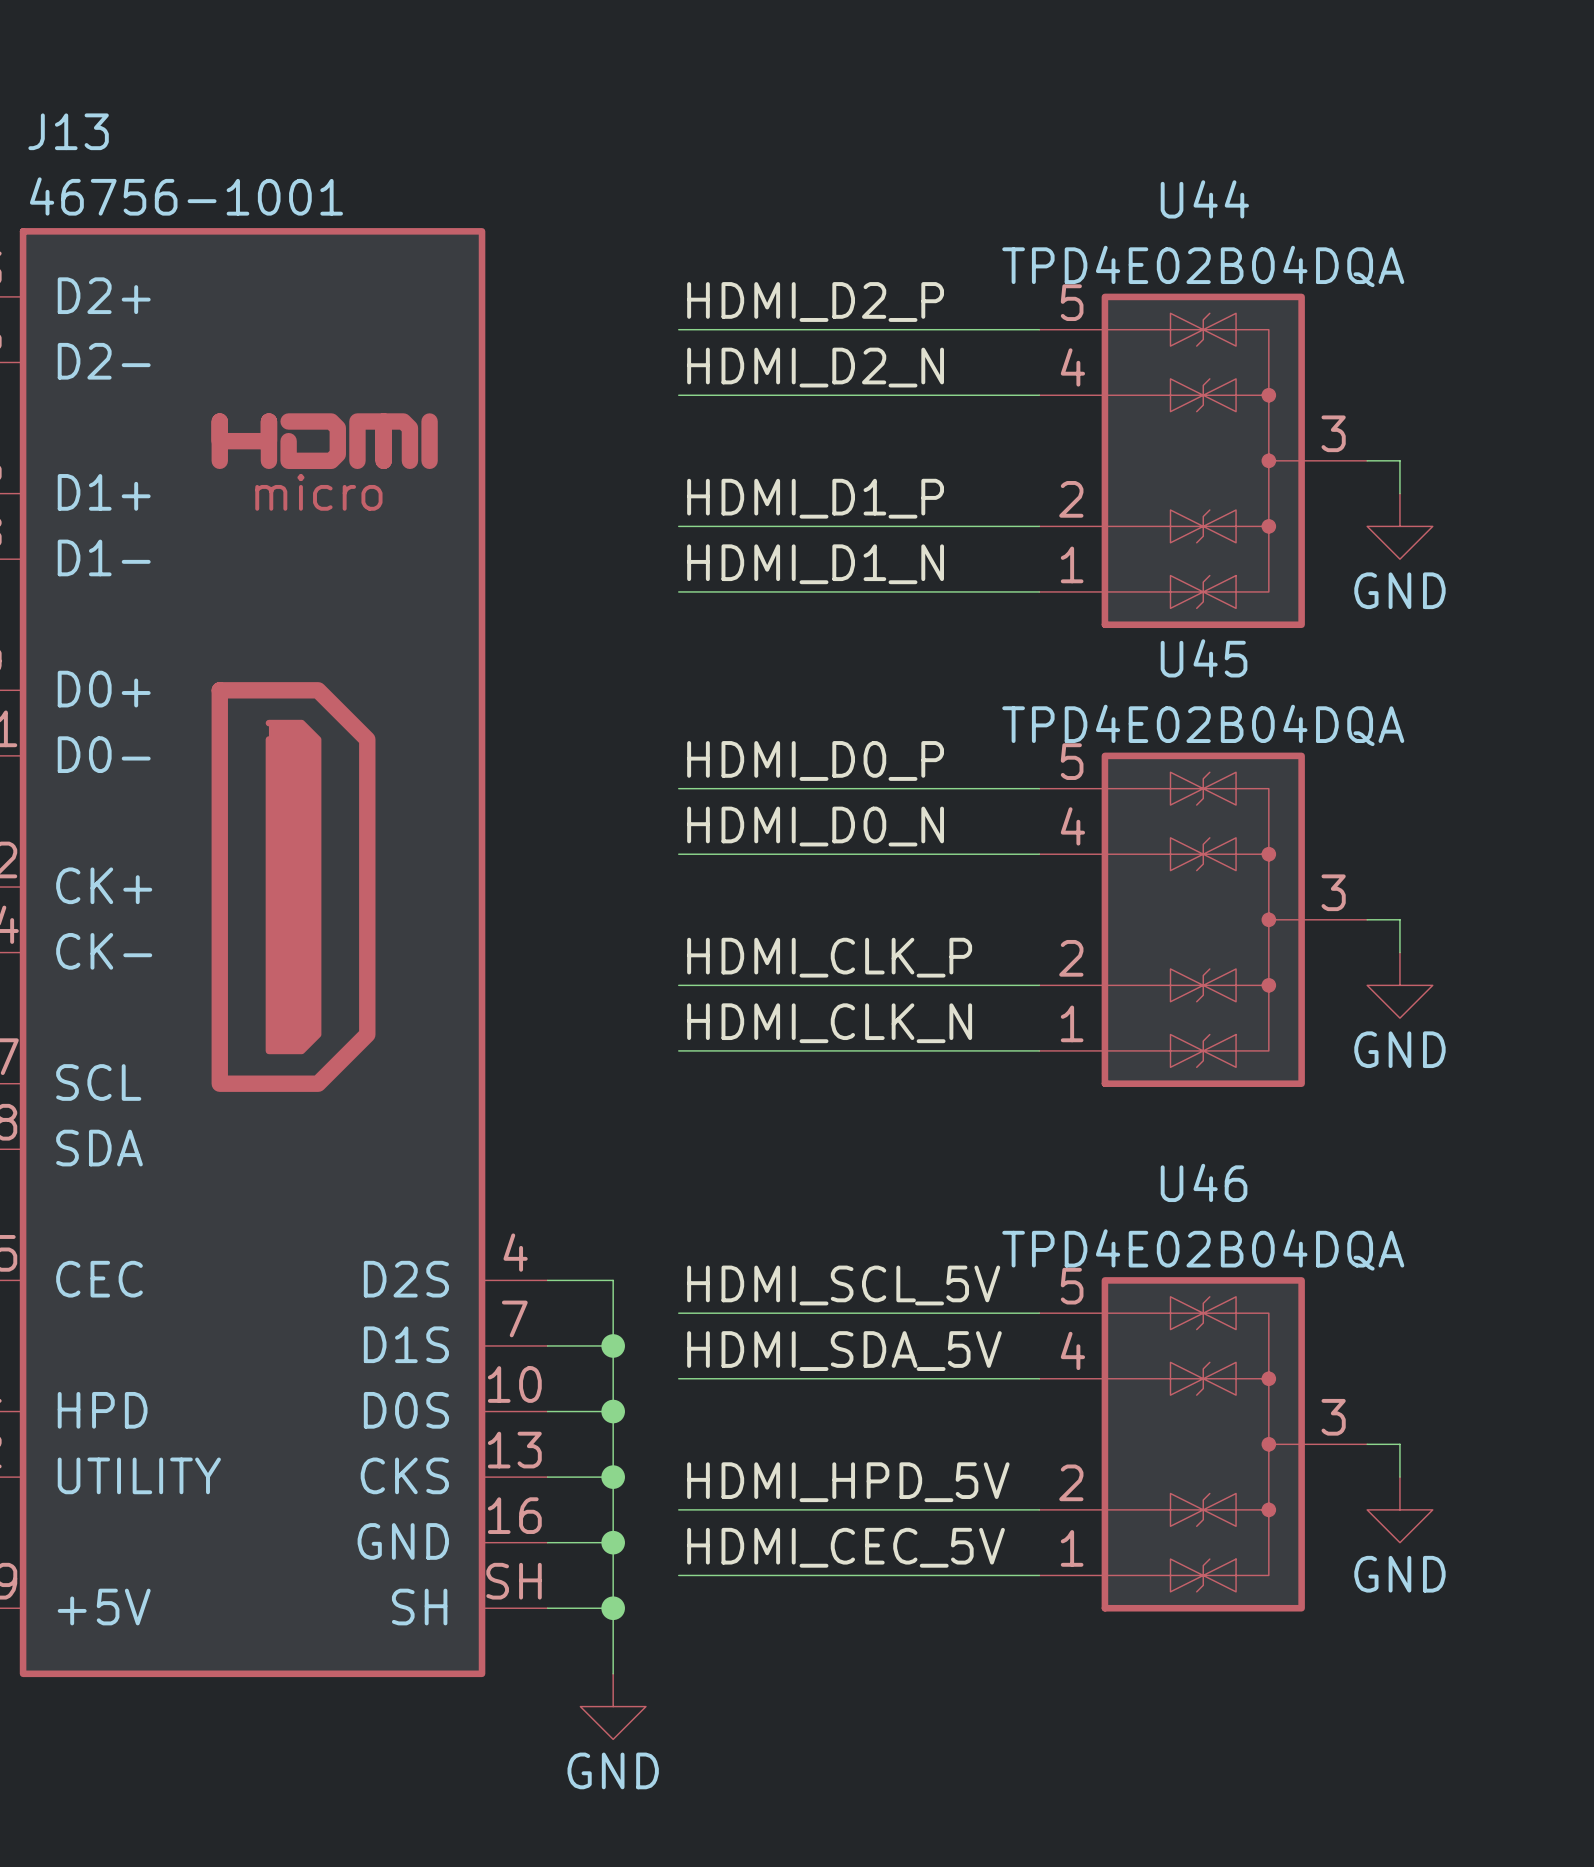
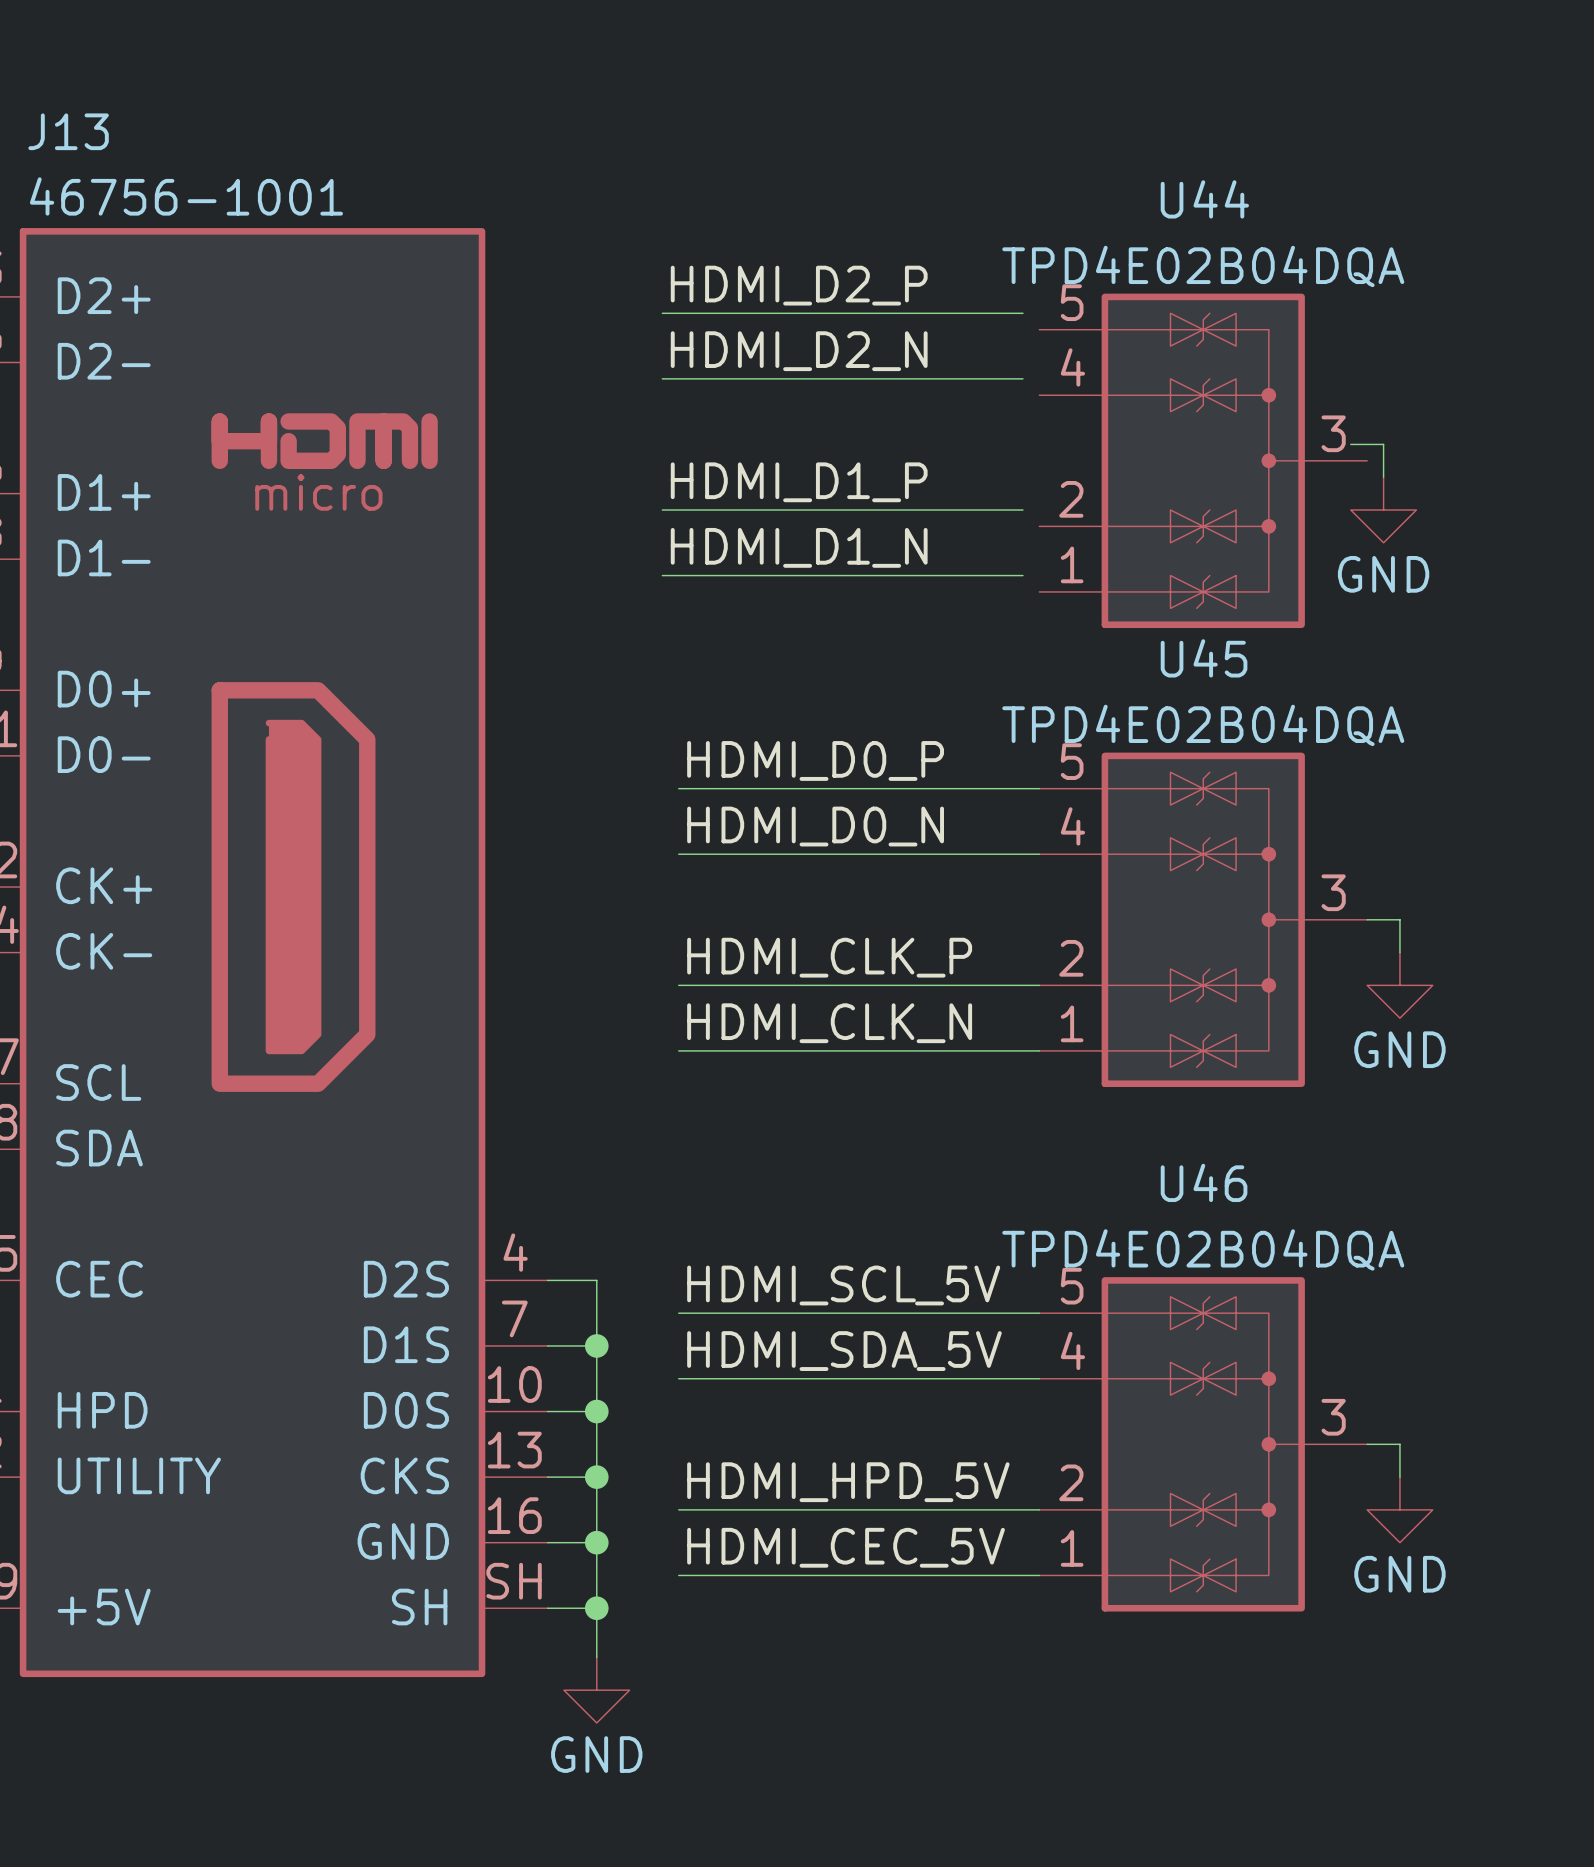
label position: HDMI_D2_P (815, 302) -> HDMI_D2_P (799, 285)
wire: (678, 329) (1039, 329) -> (662, 313) (1022, 313)
label position: HDMI_D2_N (815, 367) -> HDMI_D2_N (799, 351)
wire: (678, 395) (1039, 395) -> (662, 378) (1022, 378)
wire: (1367, 460) (1399, 460) (1399, 493) -> (1350, 444) (1383, 444) (1383, 477)
label position: HDMI_D1_P (815, 498) -> HDMI_D1_P (799, 482)
wire: (678, 526) (1039, 526) -> (662, 510) (1022, 510)
power symbol position: GND (1399, 526) -> GND (1383, 510)
label position: HDMI_D1_N (815, 564) -> HDMI_D1_N (799, 547)
wire: (678, 591) (1039, 591) -> (662, 575) (1022, 575)
wire: (596, 1280) (613, 1280) (613, 1673) -> (596, 1280) (596, 1657)
junction position: (613, 1345) -> (596, 1345)
junction position: (613, 1411) -> (596, 1411)
junction position: (613, 1477) -> (596, 1477)
junction position: (613, 1542) -> (596, 1542)
junction position: (613, 1608) -> (596, 1608)
power symbol position: GND (613, 1706) -> GND (596, 1690)

